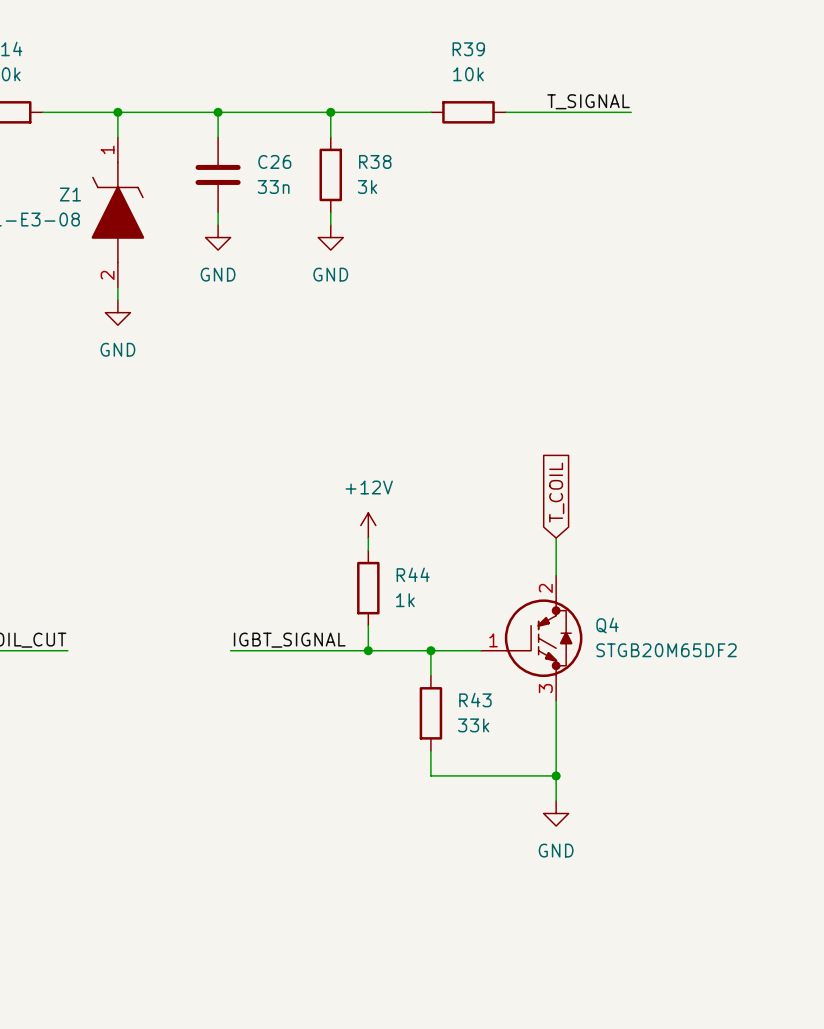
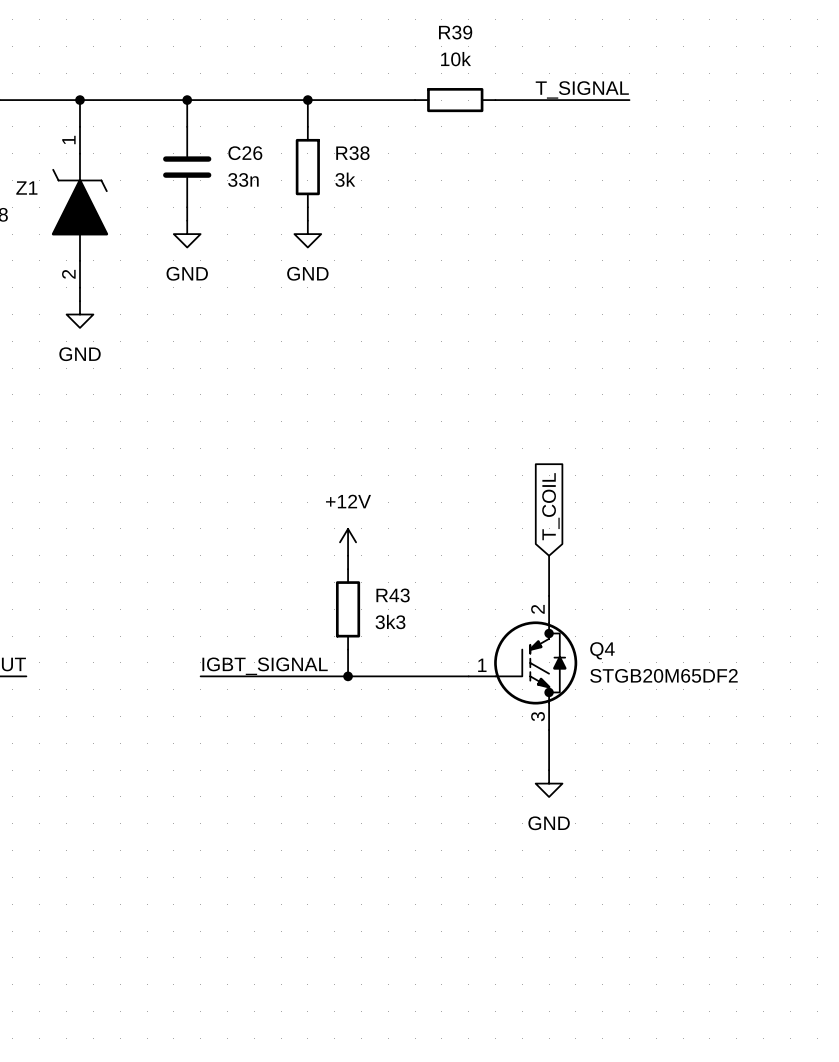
R44 name: R44 (413, 574) -> R43 (393, 595)
R44 value: 1k (405, 600) -> 3k3 (390, 622)
wire: (430, 650) (430, 675) -> none
junction: (430, 650) -> none
R43: 33k (430, 713) -> none
wire: (556, 738) (556, 800) -> none
wire: (430, 750) (430, 775) (556, 775) -> none
junction: (556, 775) -> none
power symbol position: GND (556, 813) -> GND (549, 783)

